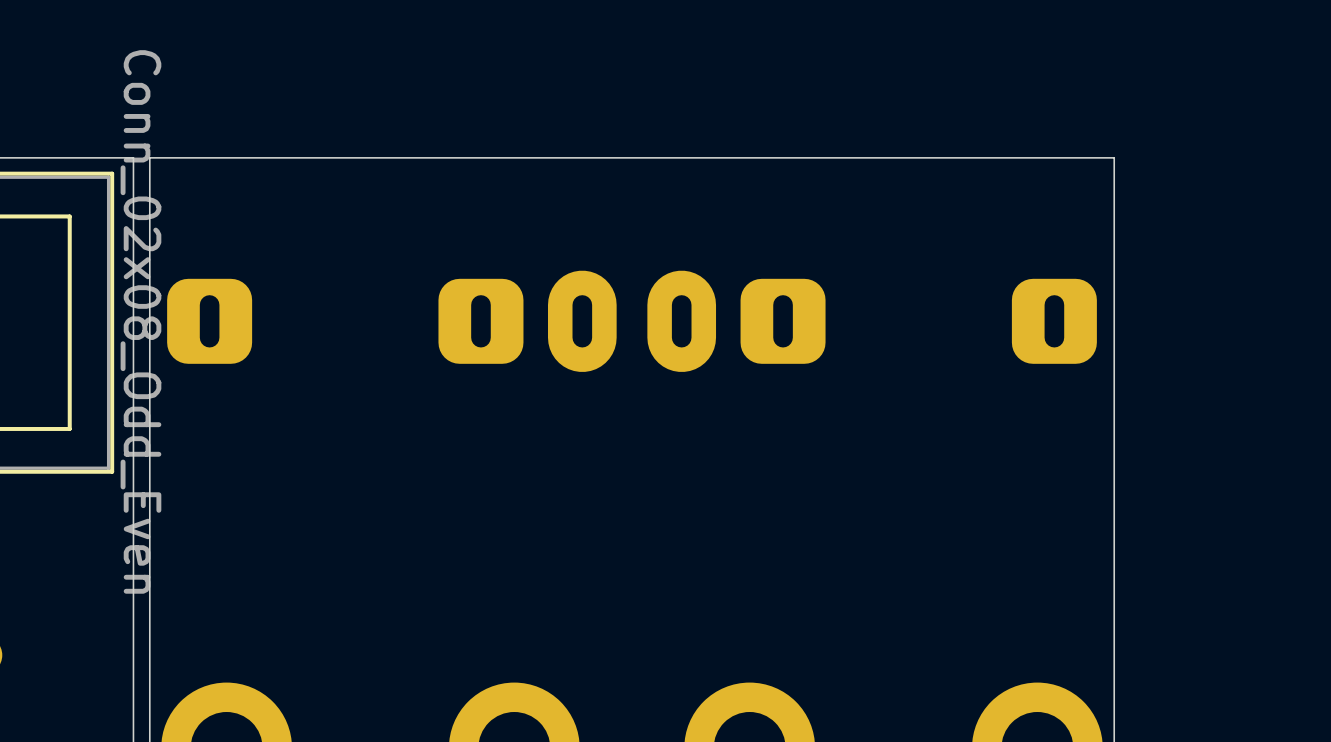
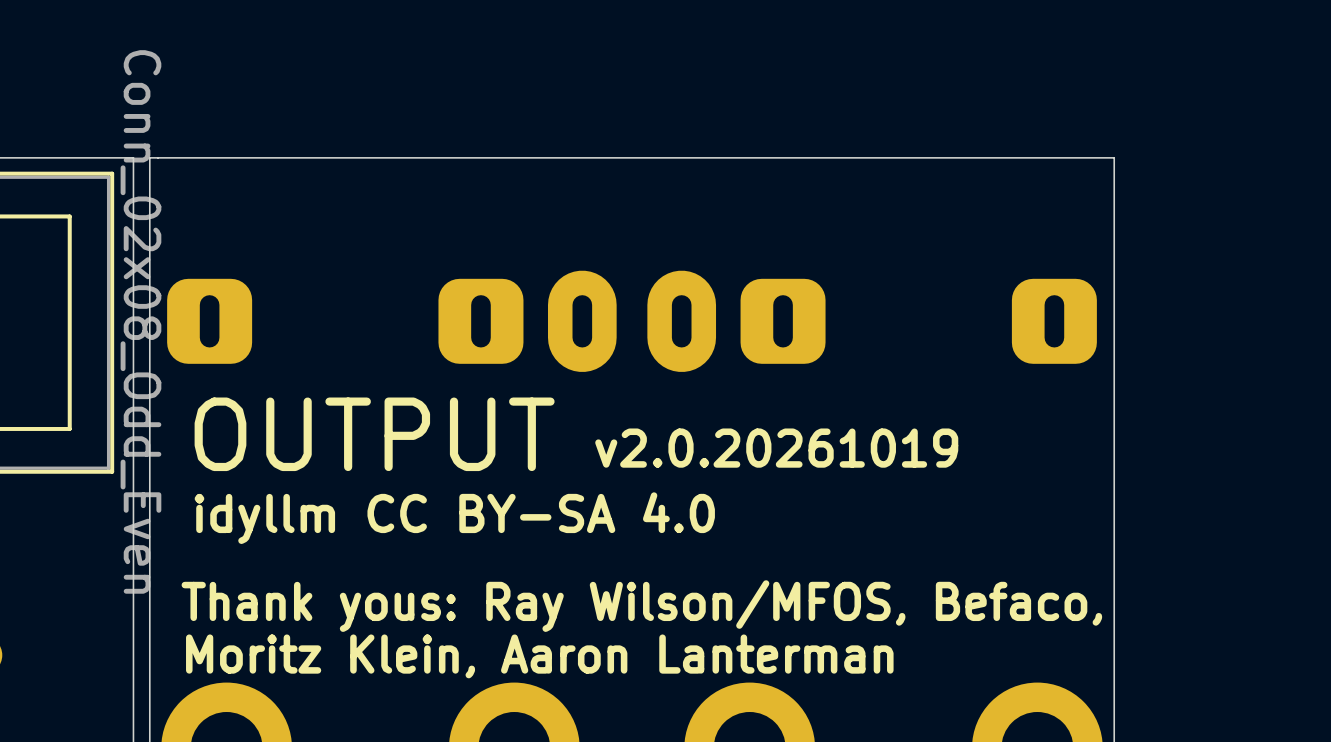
text: none -> OUTPUT (374, 434)
text: none -> v2.0.20261019 (776, 448)
text: none -> idyllm CC BY-SA 4.0 (454, 518)
text: none -> Thank yous: Ray Wilson/MFOS, Befaco, (641, 606)
text: none -> Moritz Klein, Aaron Lanterman (539, 656)

